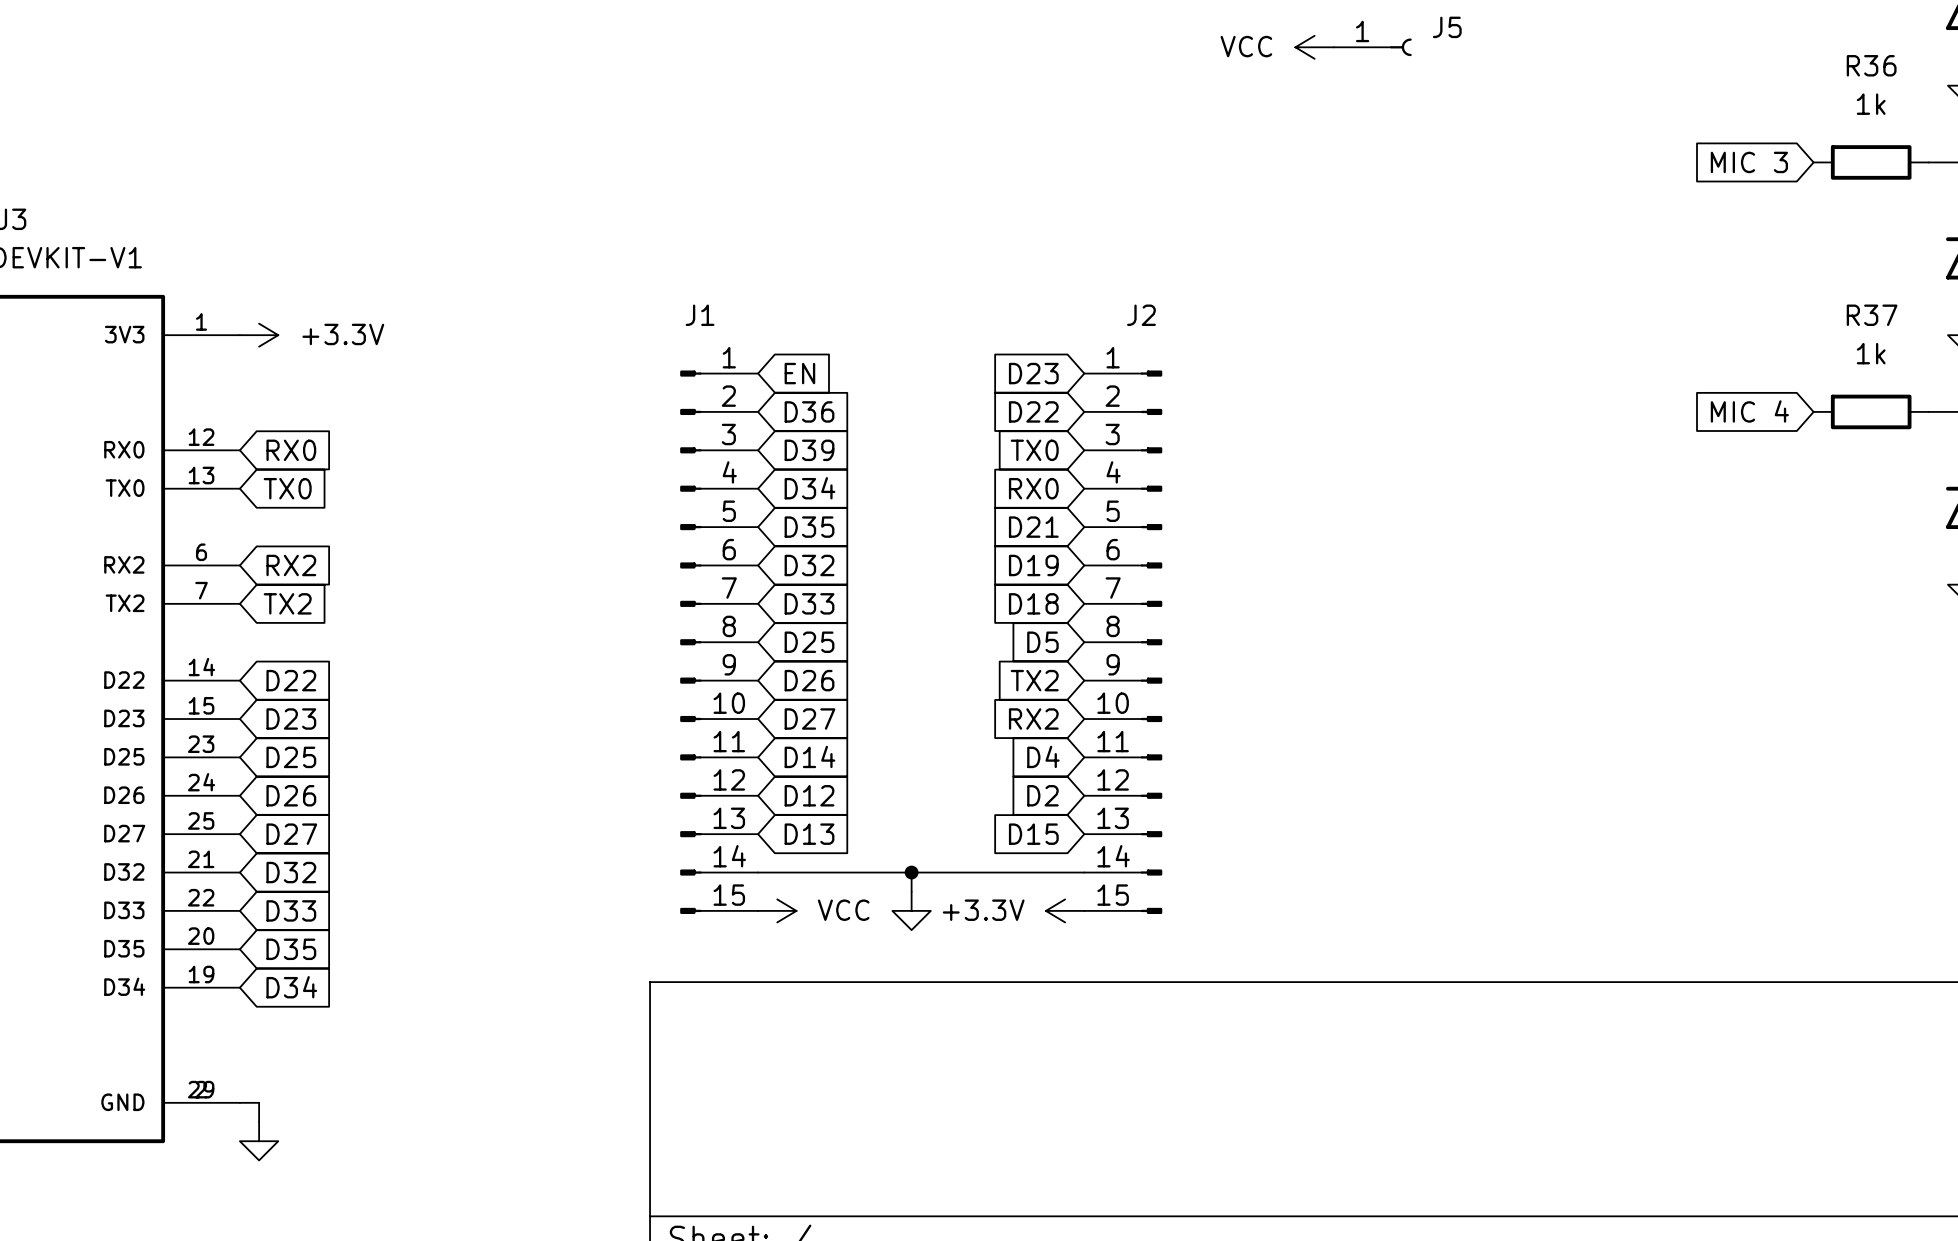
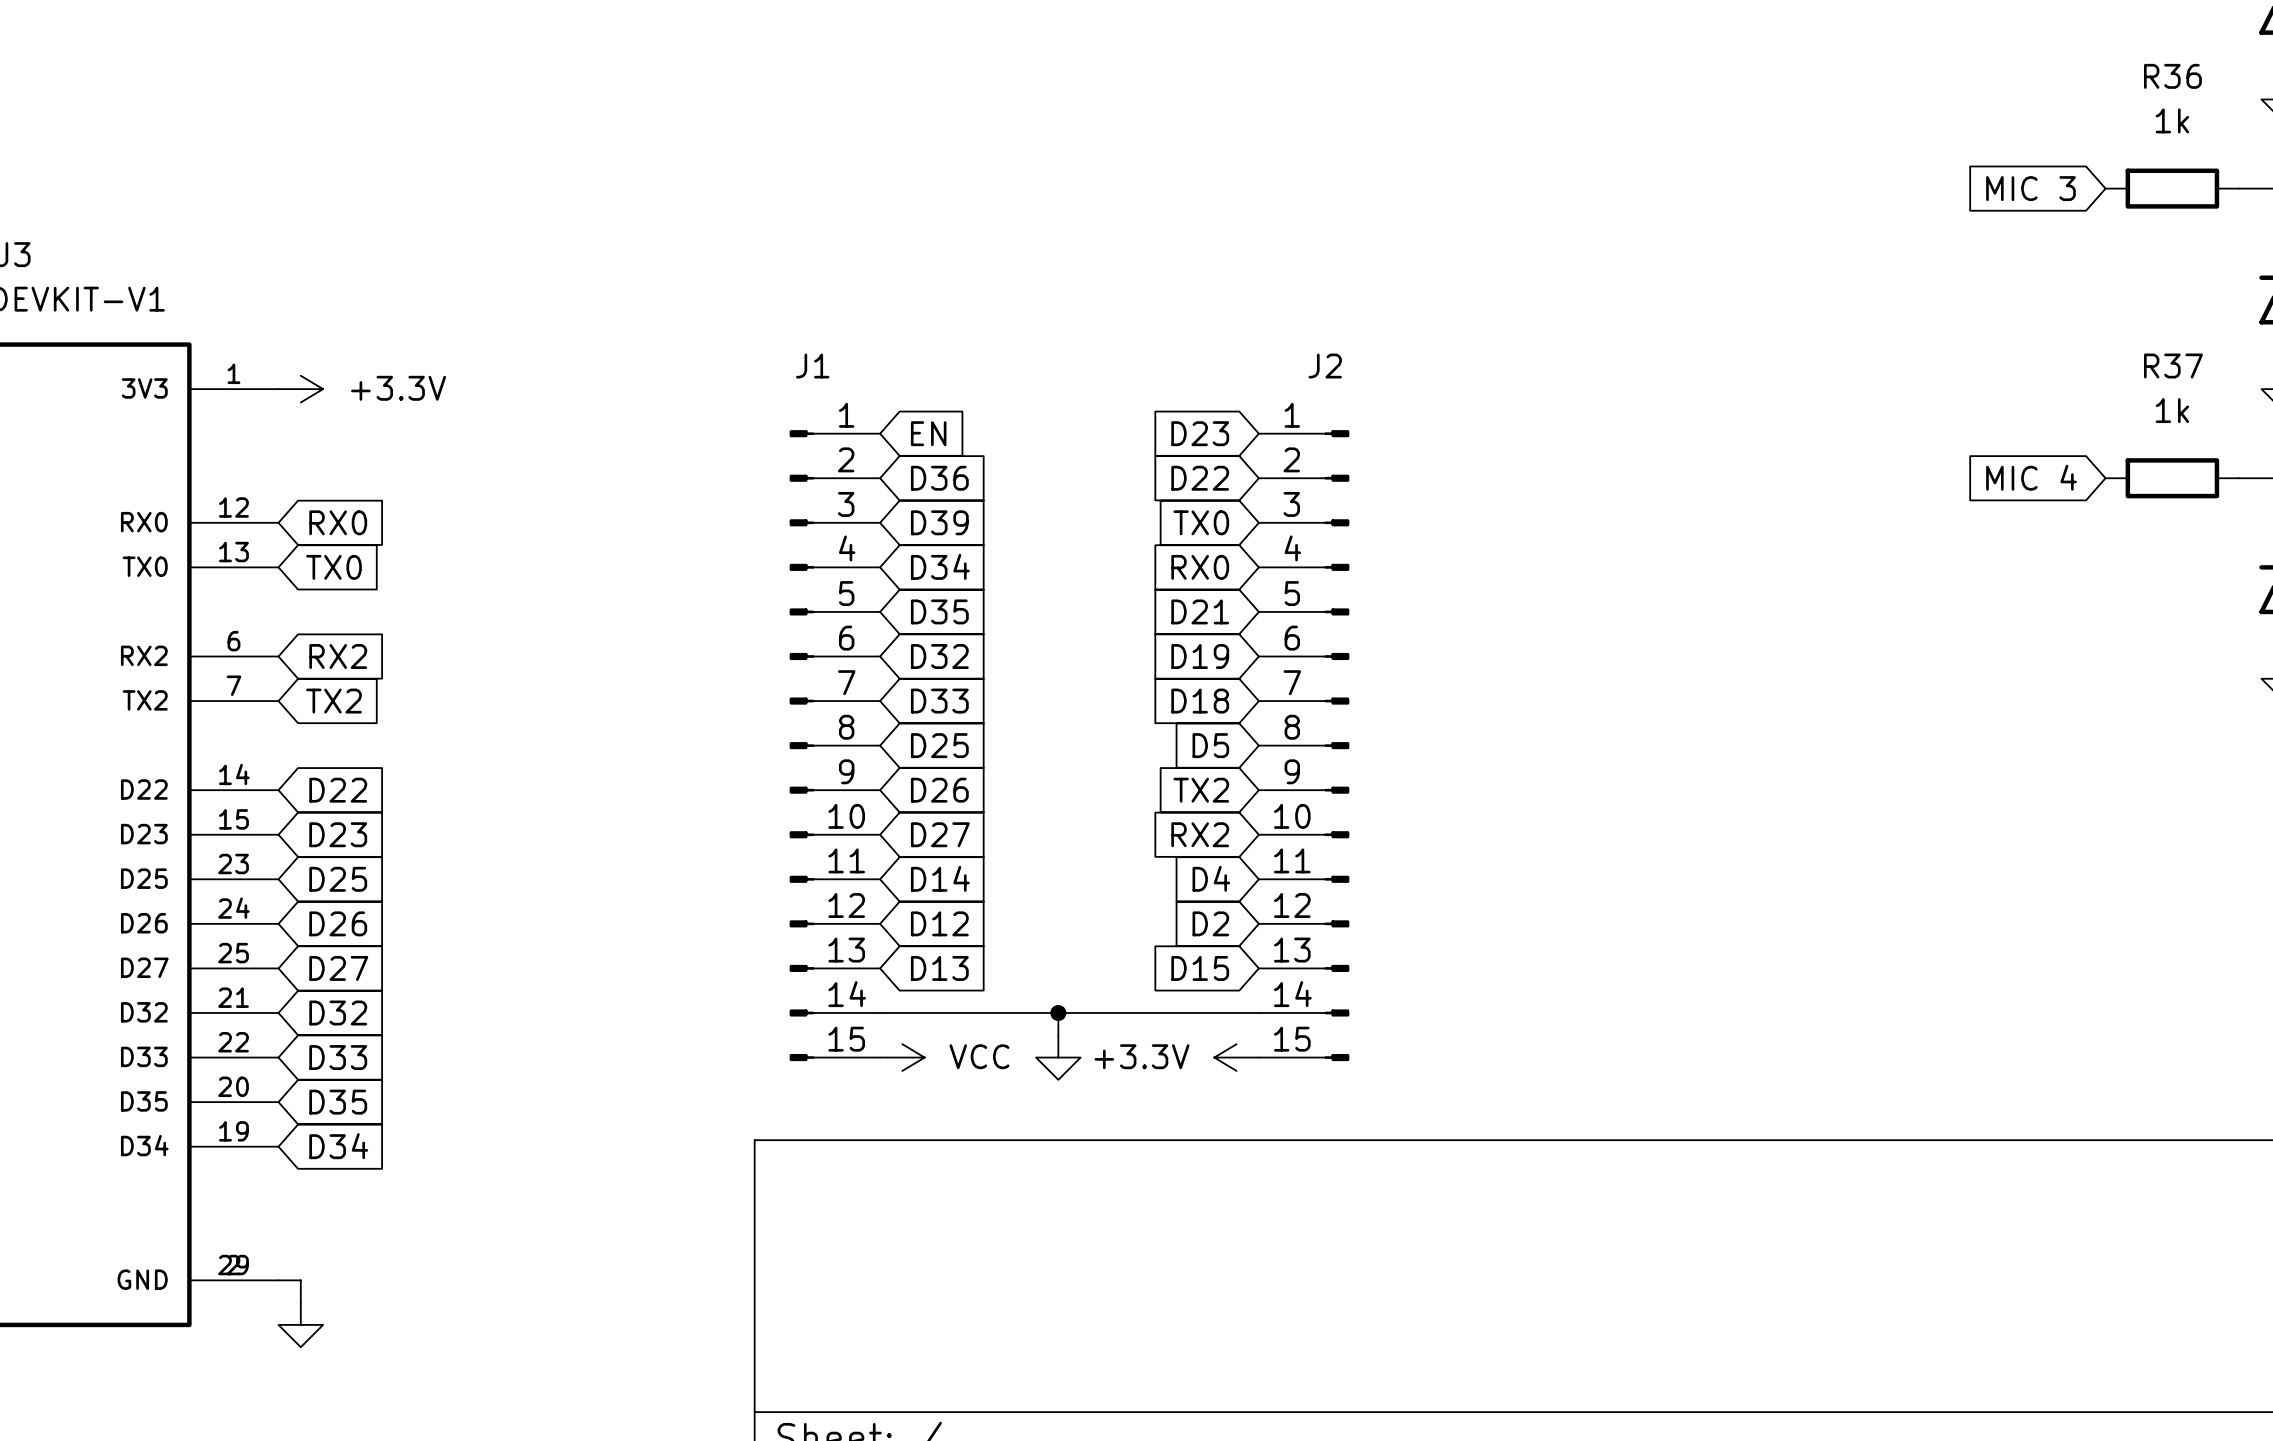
power symbol: VCC (1314, 47) -> none
J5: (1372, 47) -> none

